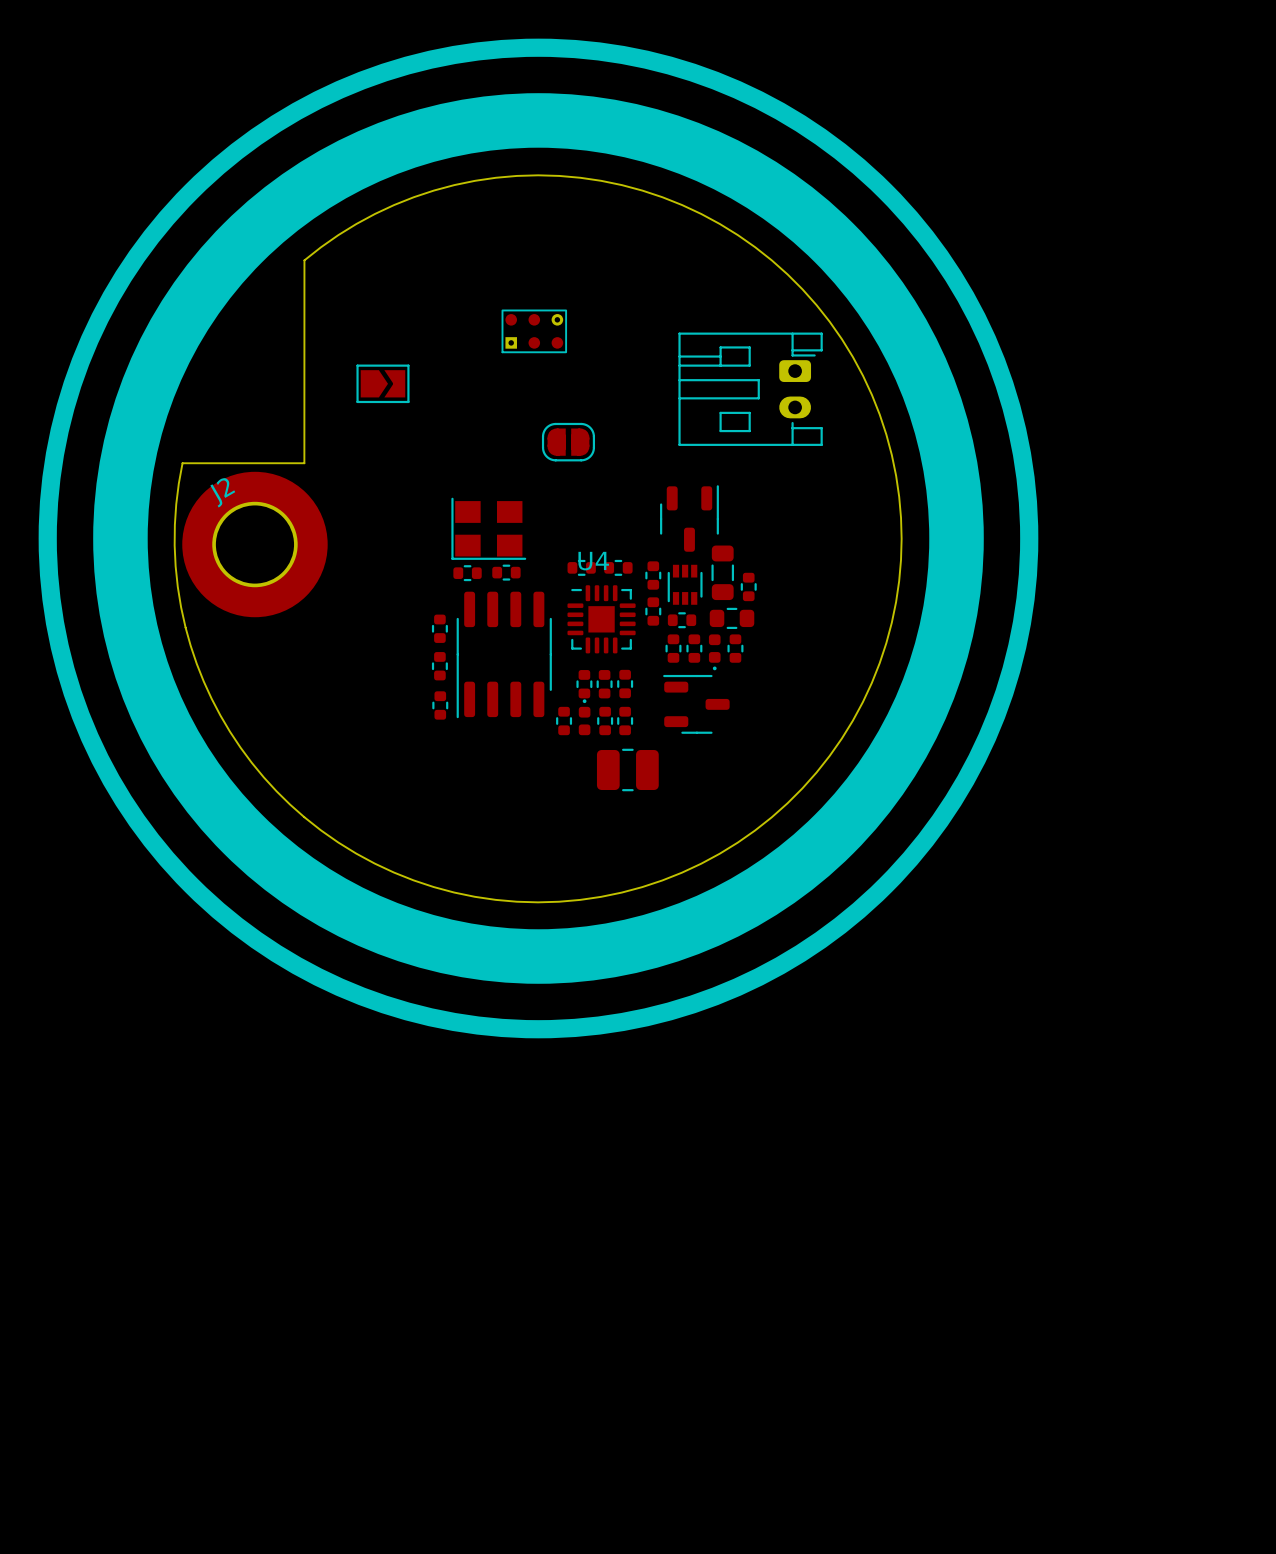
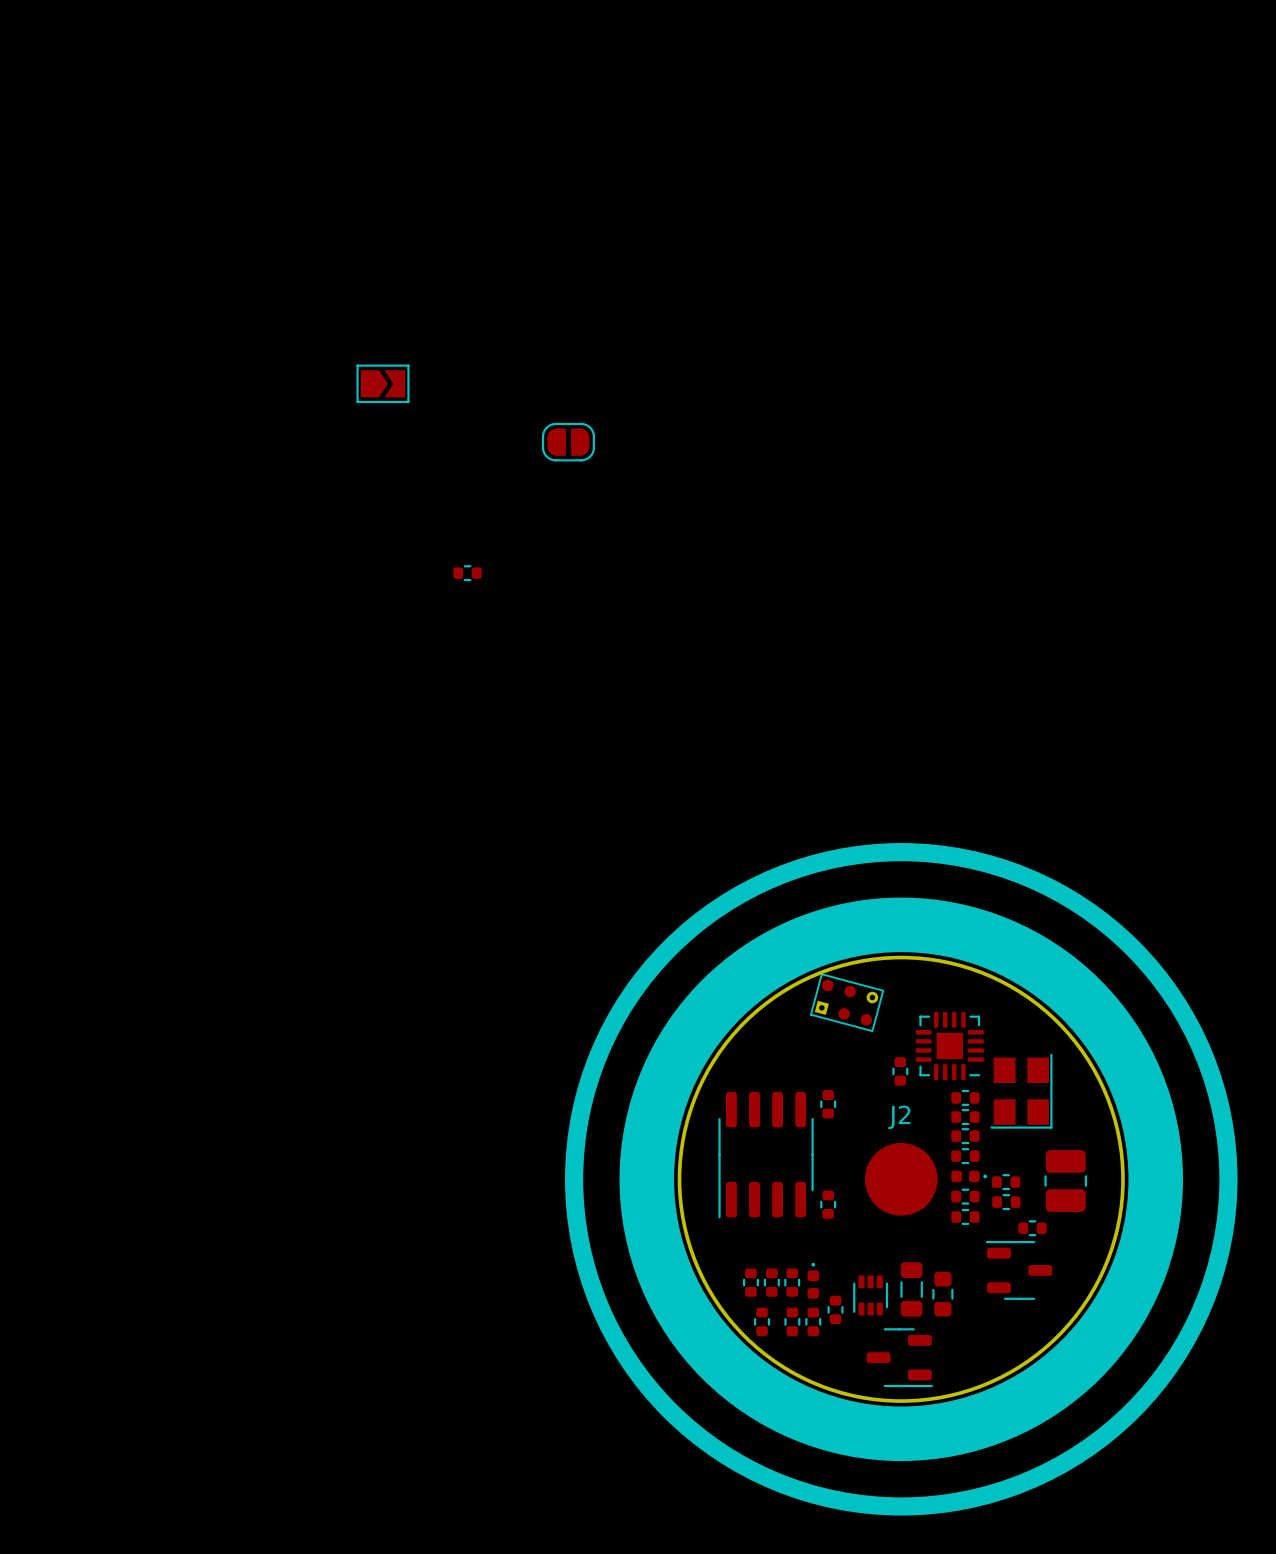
board edge: (304, 260) (304, 463) (182, 463) (176, 504) (175, 566) (181, 607) (190, 645) (203, 681) (220, 715) (240, 747) (263, 777) (290, 804) (320, 830) (374, 863) (433, 887) (474, 896) (516, 901) (580, 899) (642, 887) (681, 872) (719, 853) (771, 817) (802, 788) (829, 755) (862, 702) (886, 643) (896, 602) (901, 560) (899, 496) (891, 455) (879, 414) (852, 357) (816, 305) (787, 274) (755, 247) (701, 214) (642, 190) (601, 180) (559, 175) (495, 177) (454, 185) (413, 197) (356, 224) (304, 260) -> none
part: (534, 331) -> none
part: (750, 389) -> none
J2 footprint: [182, 471, 328, 618] -> [864, 1142, 938, 1216]
part: (689, 518) -> none
part: (488, 528) -> none
U4: (538, 538) -> none
part: (581, 567) -> none
part: (618, 567) -> none
part: (506, 572) -> none
part: (722, 572) -> none
part: (653, 575) -> none
part: (685, 584) -> none
part: (748, 586) -> none
part: (653, 611) -> none
part: (732, 618) -> none
part: (601, 619) -> none
part: (682, 620) -> none
part: (439, 628) -> none
part: (673, 648) -> none
part: (694, 648) -> none
part: (735, 648) -> none
part: (714, 652) -> none
part: (504, 654) -> none
part: (439, 666) -> none
part: (584, 684) -> none
part: (604, 684) -> none
part: (625, 684) -> none
part: (696, 704) -> none
part: (440, 705) -> none
part: (584, 717) -> none
part: (564, 721) -> none
part: (605, 721) -> none
part: (625, 721) -> none
part: (627, 770) -> none
drawing: none -> [565, 843, 1238, 1516]
round board edge: none -> [677, 955, 1125, 1403]
part: none -> (847, 1002)
part: none -> (949, 1045)
part: none -> (900, 1071)
part: none -> (1021, 1091)
part: none -> (965, 1097)
part: none -> (828, 1104)
part: none -> (965, 1117)
part: none -> (965, 1136)
part: none -> (766, 1155)
part: none -> (965, 1156)
part: none -> (969, 1176)
part: none -> (1065, 1181)
part: none -> (1006, 1182)
part: none -> (965, 1196)
part: none -> (1006, 1202)
part: none -> (828, 1204)
part: none -> (965, 1216)
part: none -> (1032, 1228)
part: none -> (1019, 1270)
part: none -> (813, 1280)
part: none -> (750, 1282)
part: none -> (771, 1282)
part: none -> (792, 1282)
part: none -> (911, 1289)
part: none -> (942, 1294)
part: none -> (870, 1295)
part: none -> (835, 1309)
part: none -> (762, 1321)
part: none -> (792, 1321)
part: none -> (813, 1321)
part: none -> (899, 1357)

